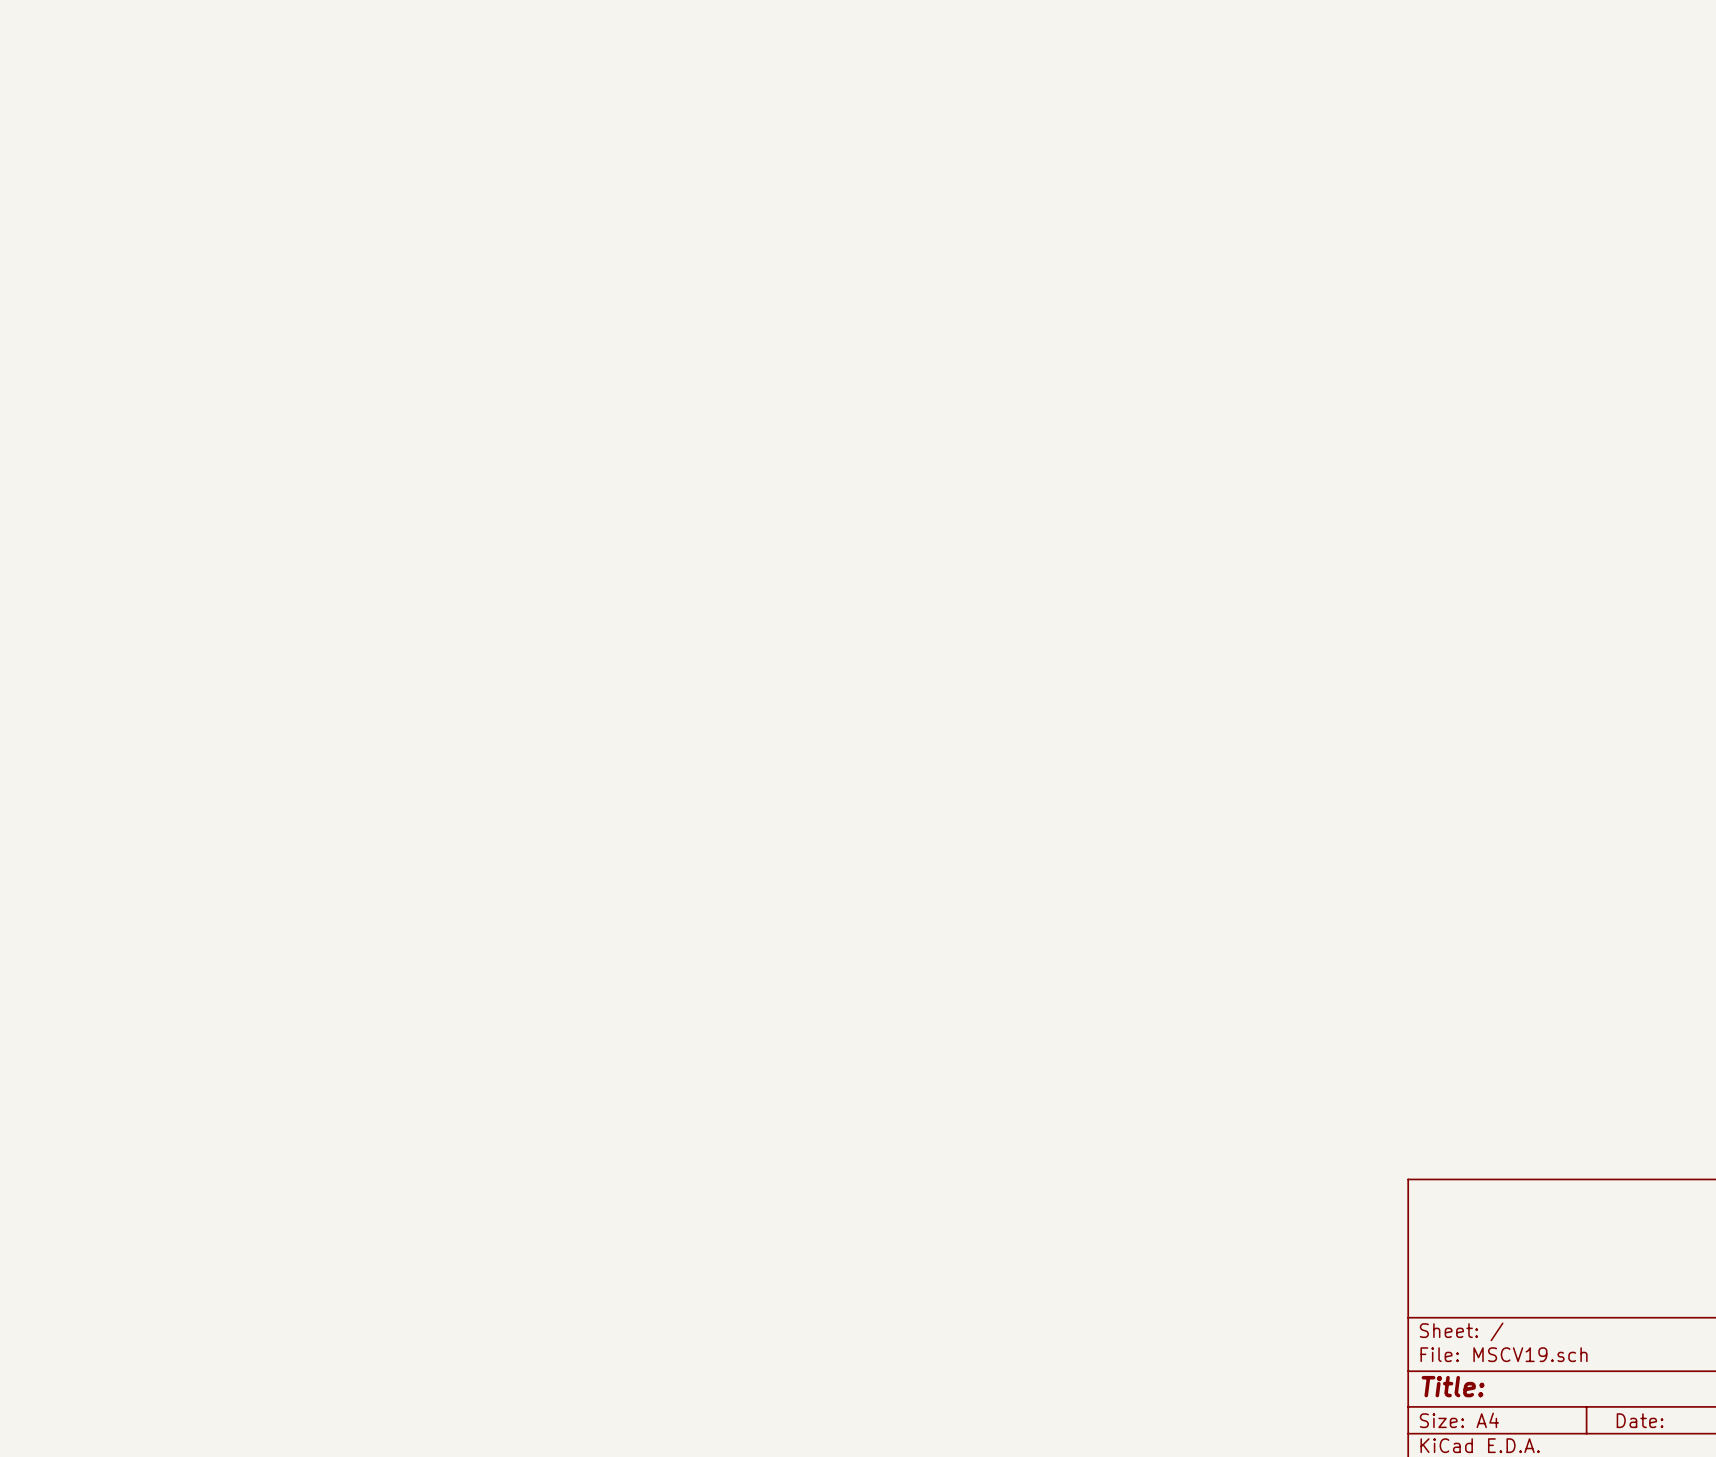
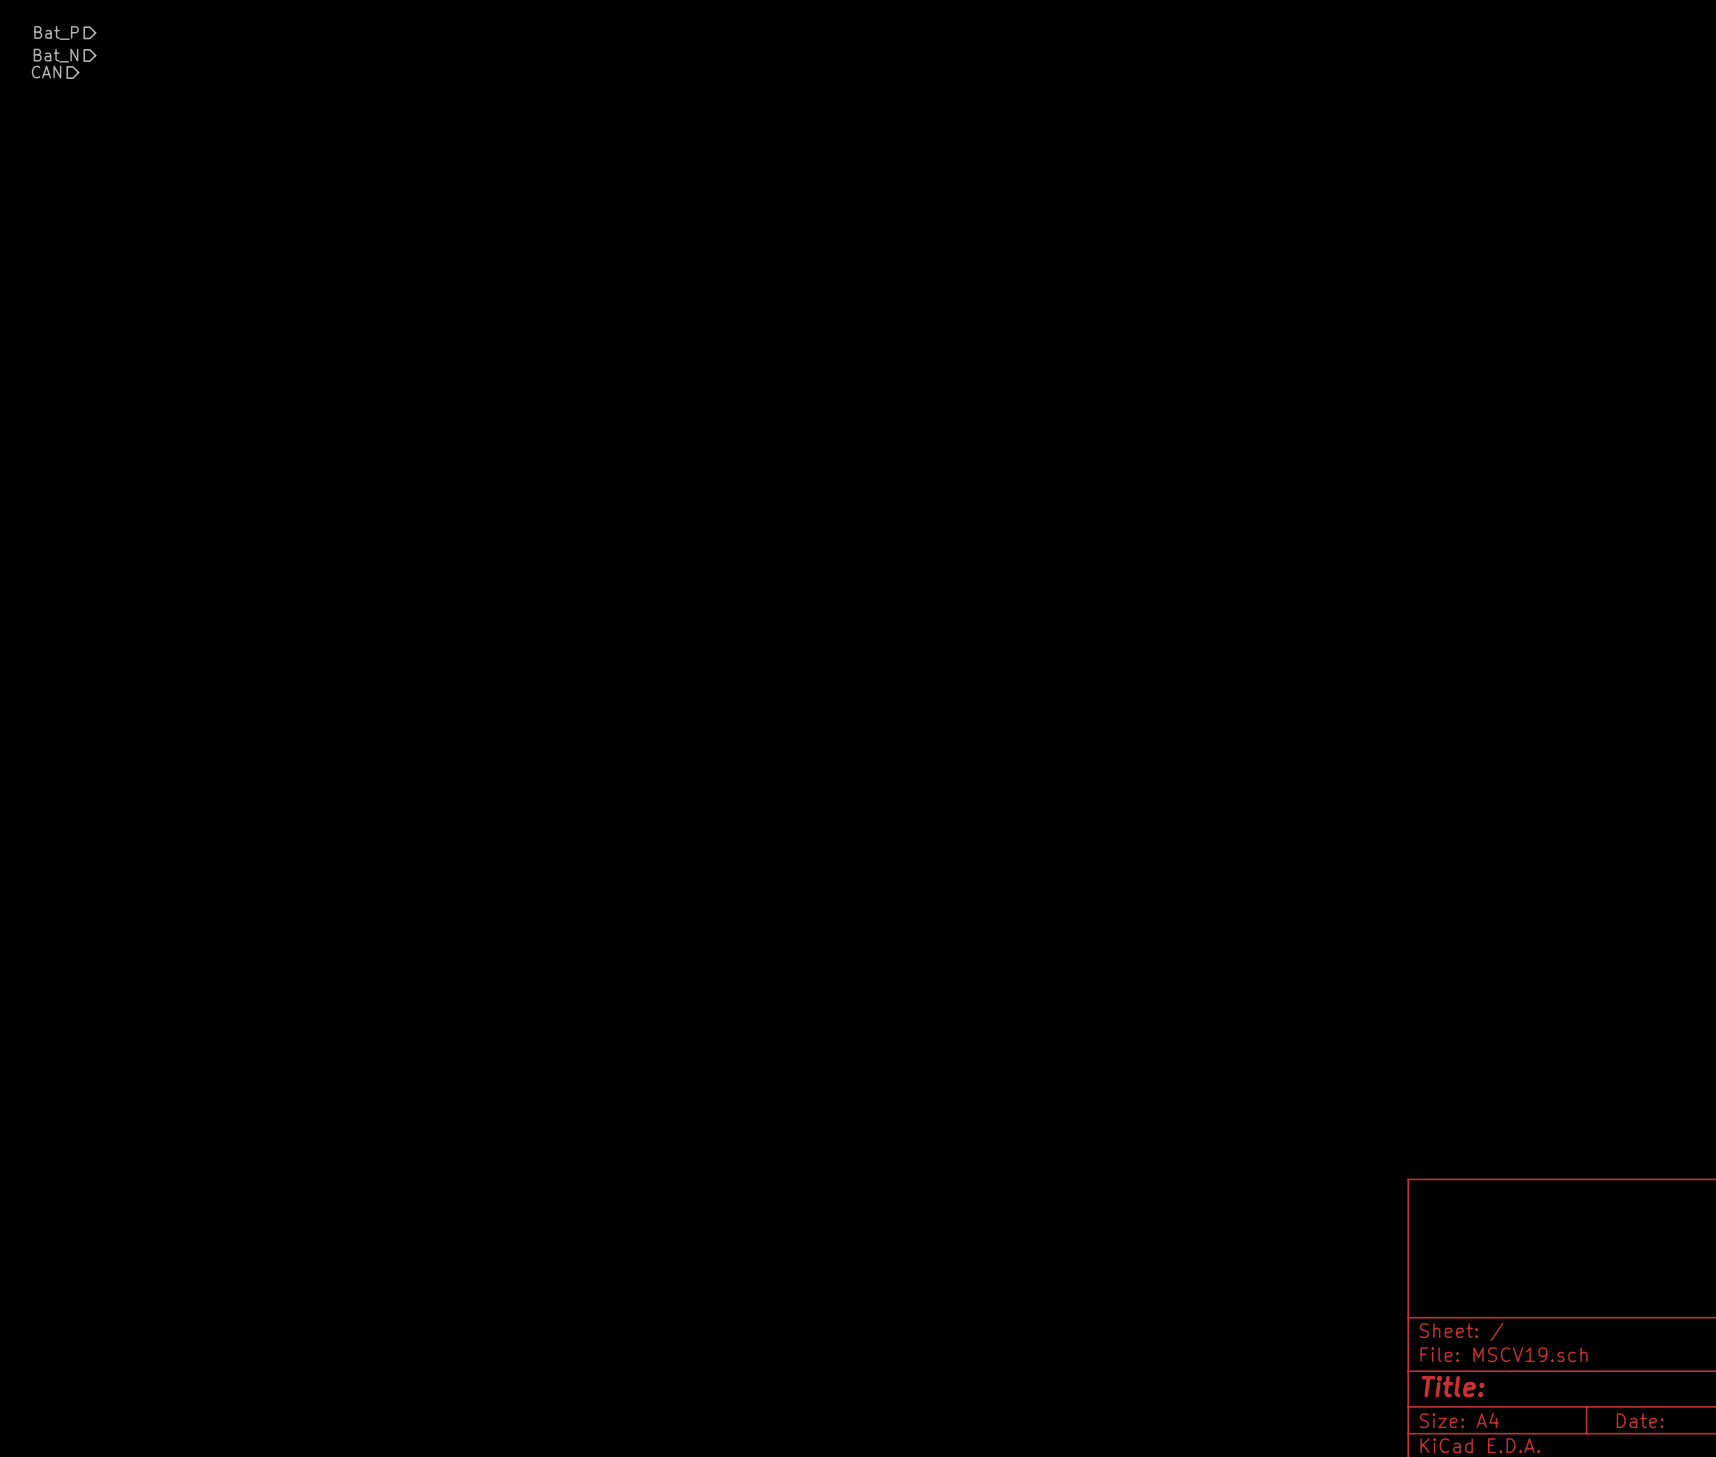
hierarchical label: none -> Bat_P (56, 32)
hierarchical label: none -> Bat_N (56, 55)
hierarchical label: none -> CAN (46, 72)

